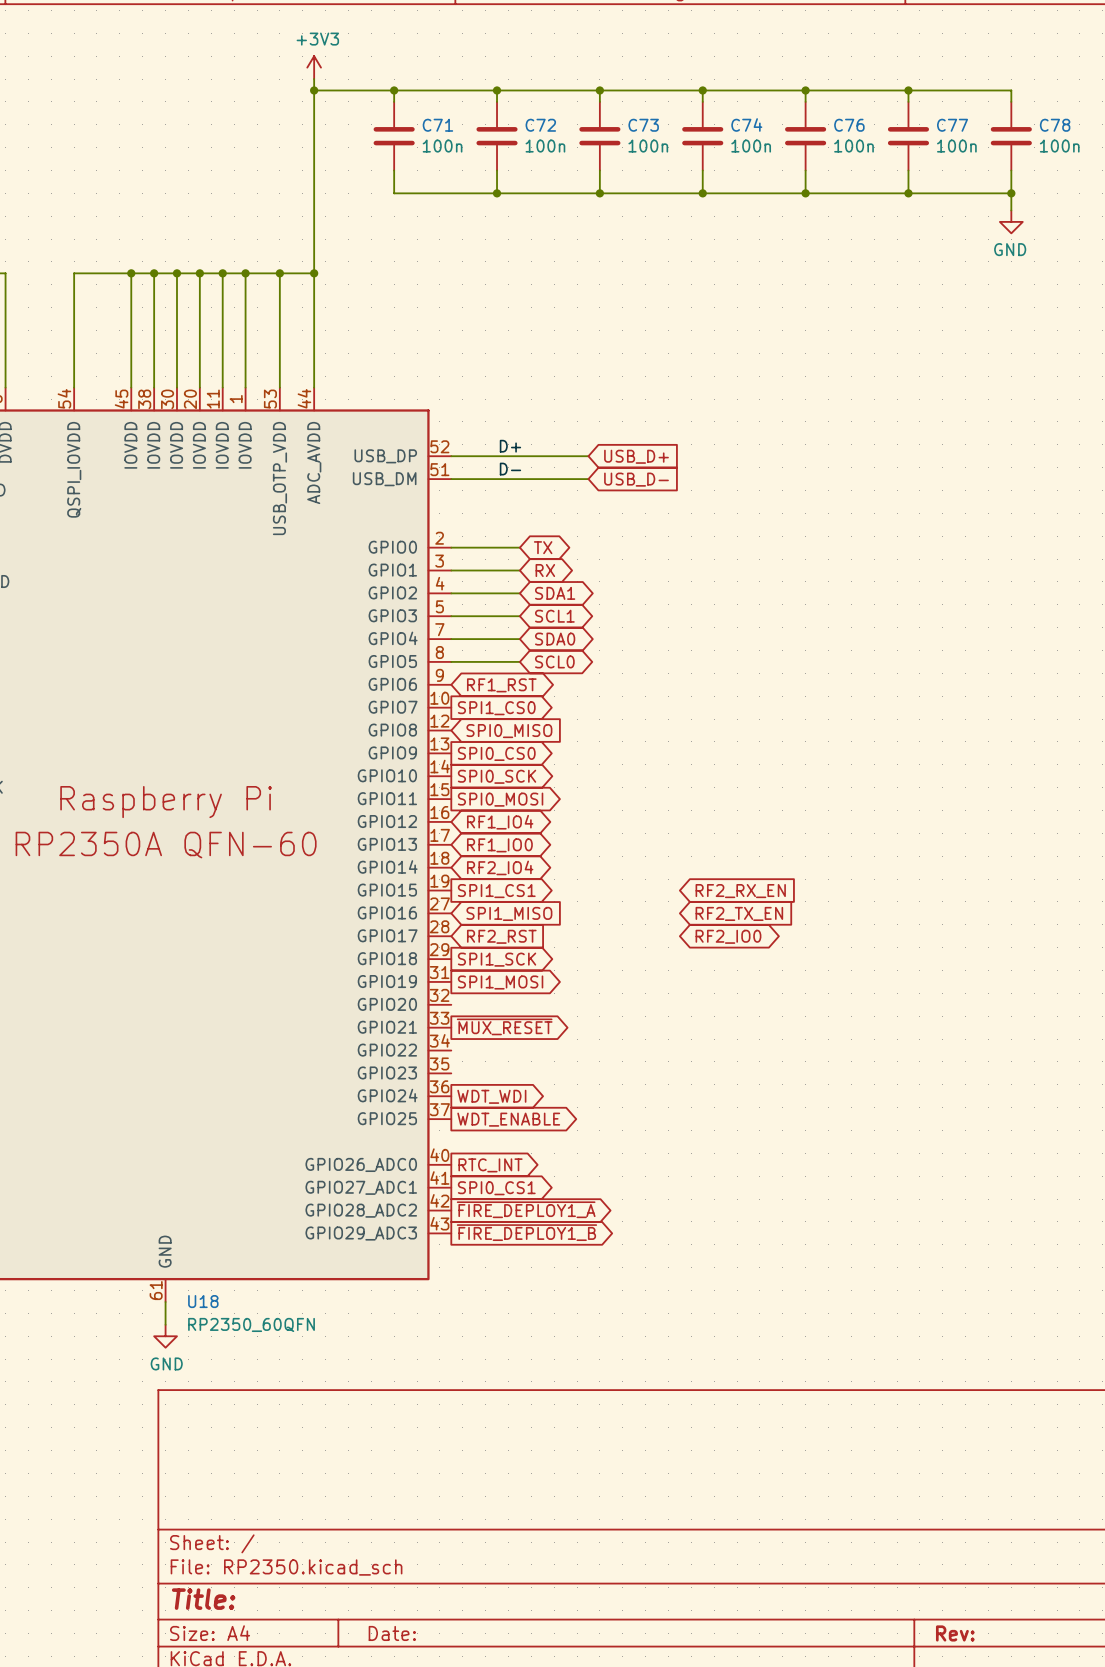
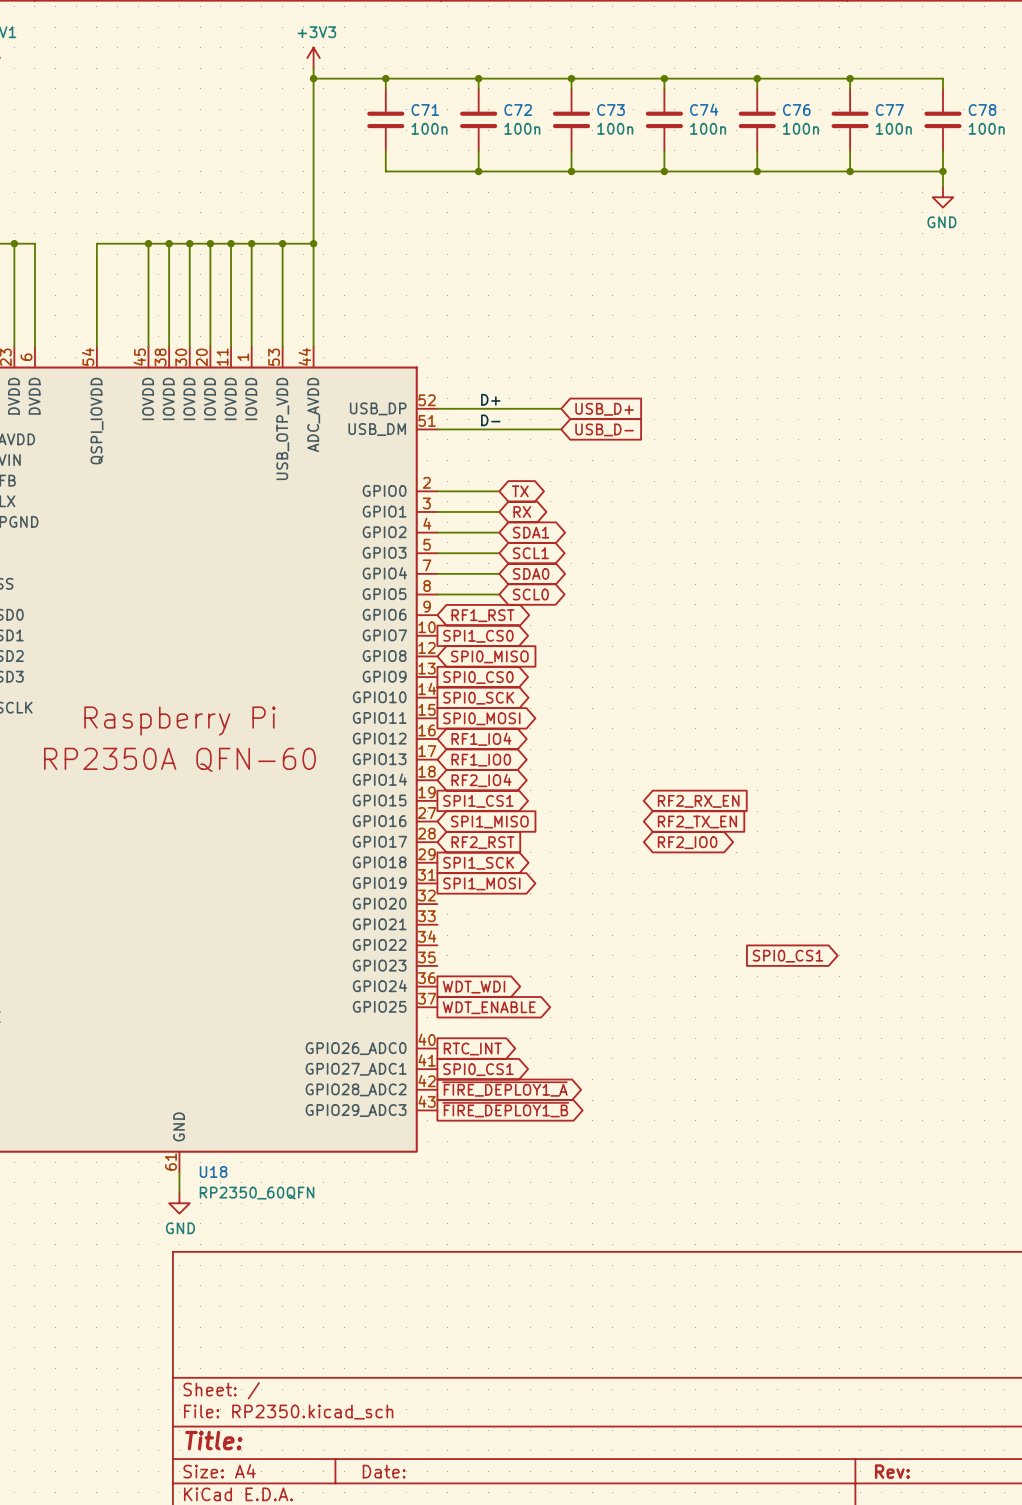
global label: ~{MUX_RESET} (504, 1026) -> none
global label: none -> SPI0_CS1 (787, 956)

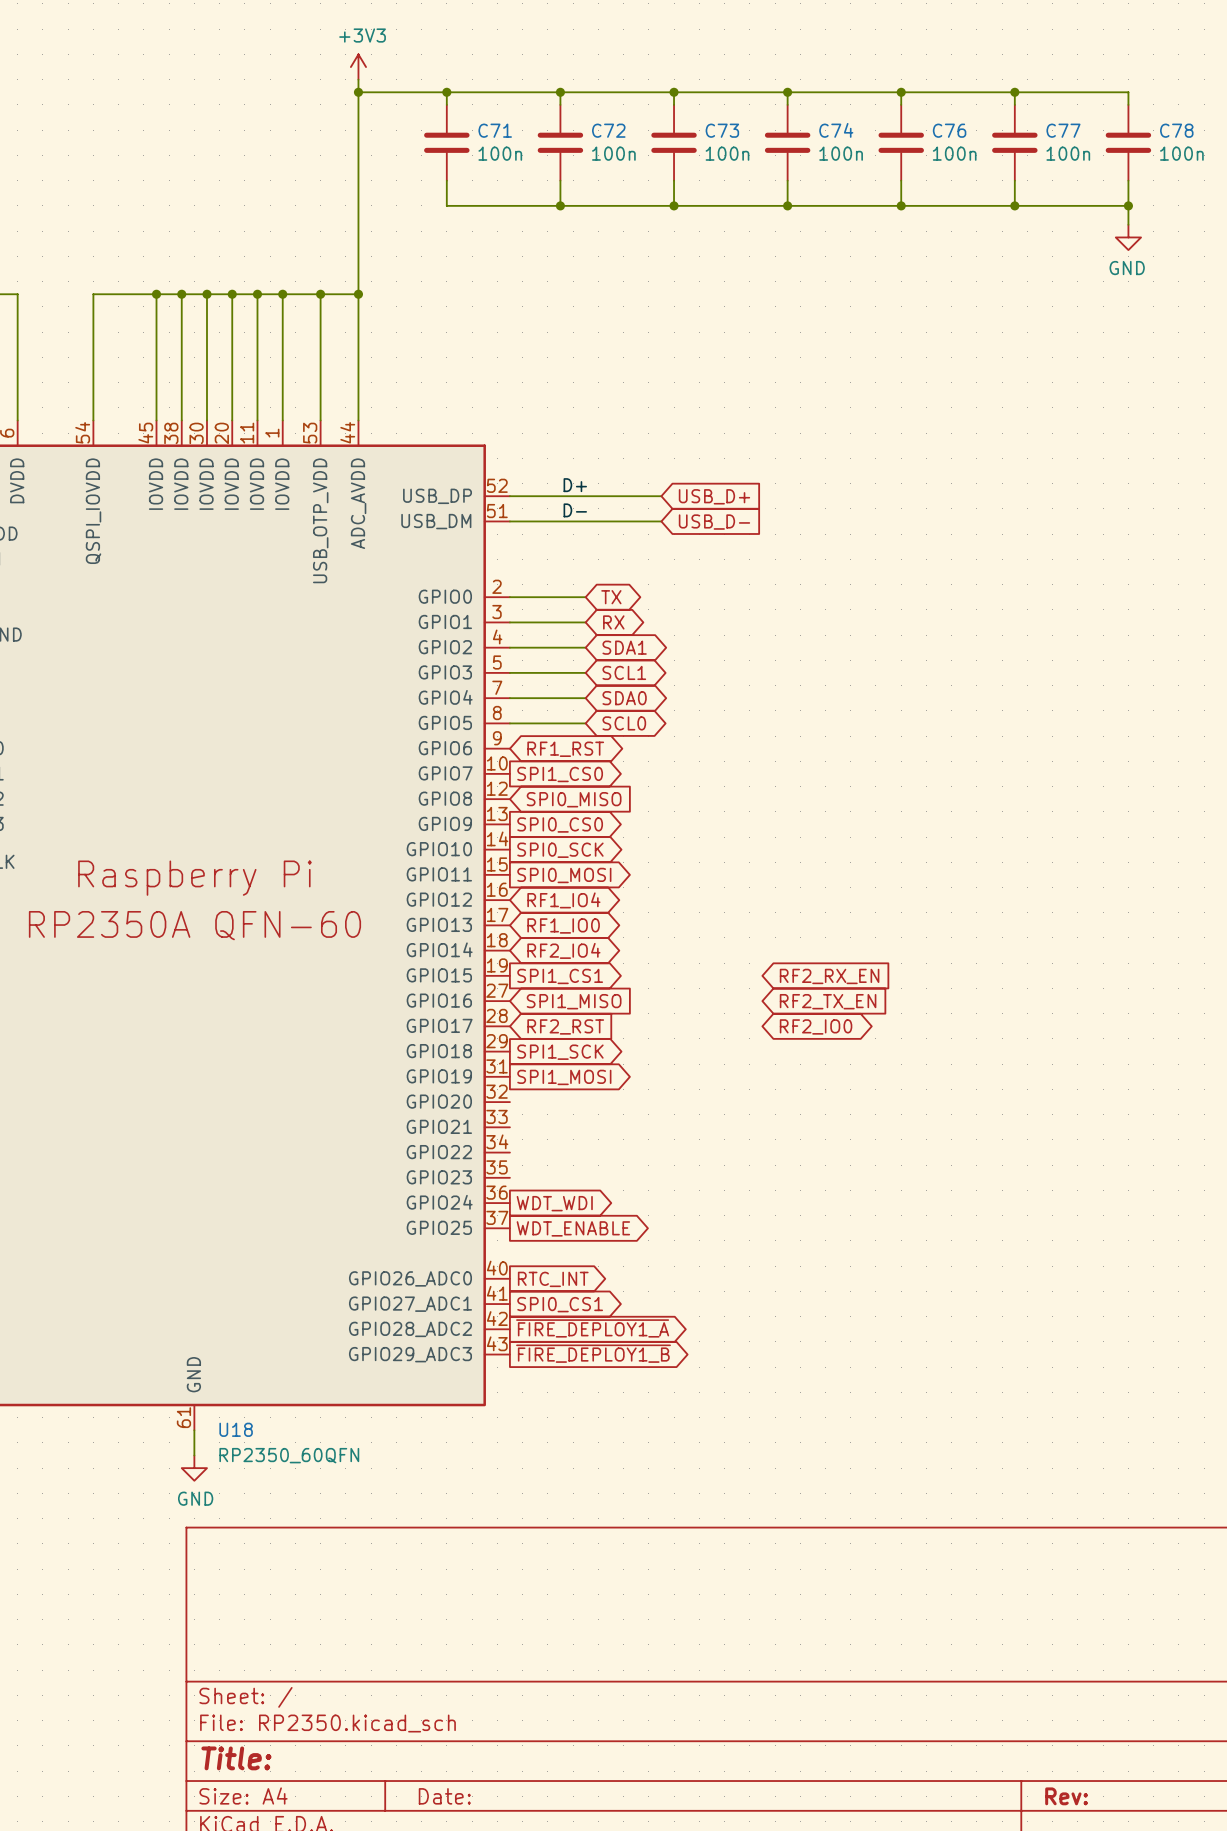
global label: SPI0_CS1 (787, 956) -> none

